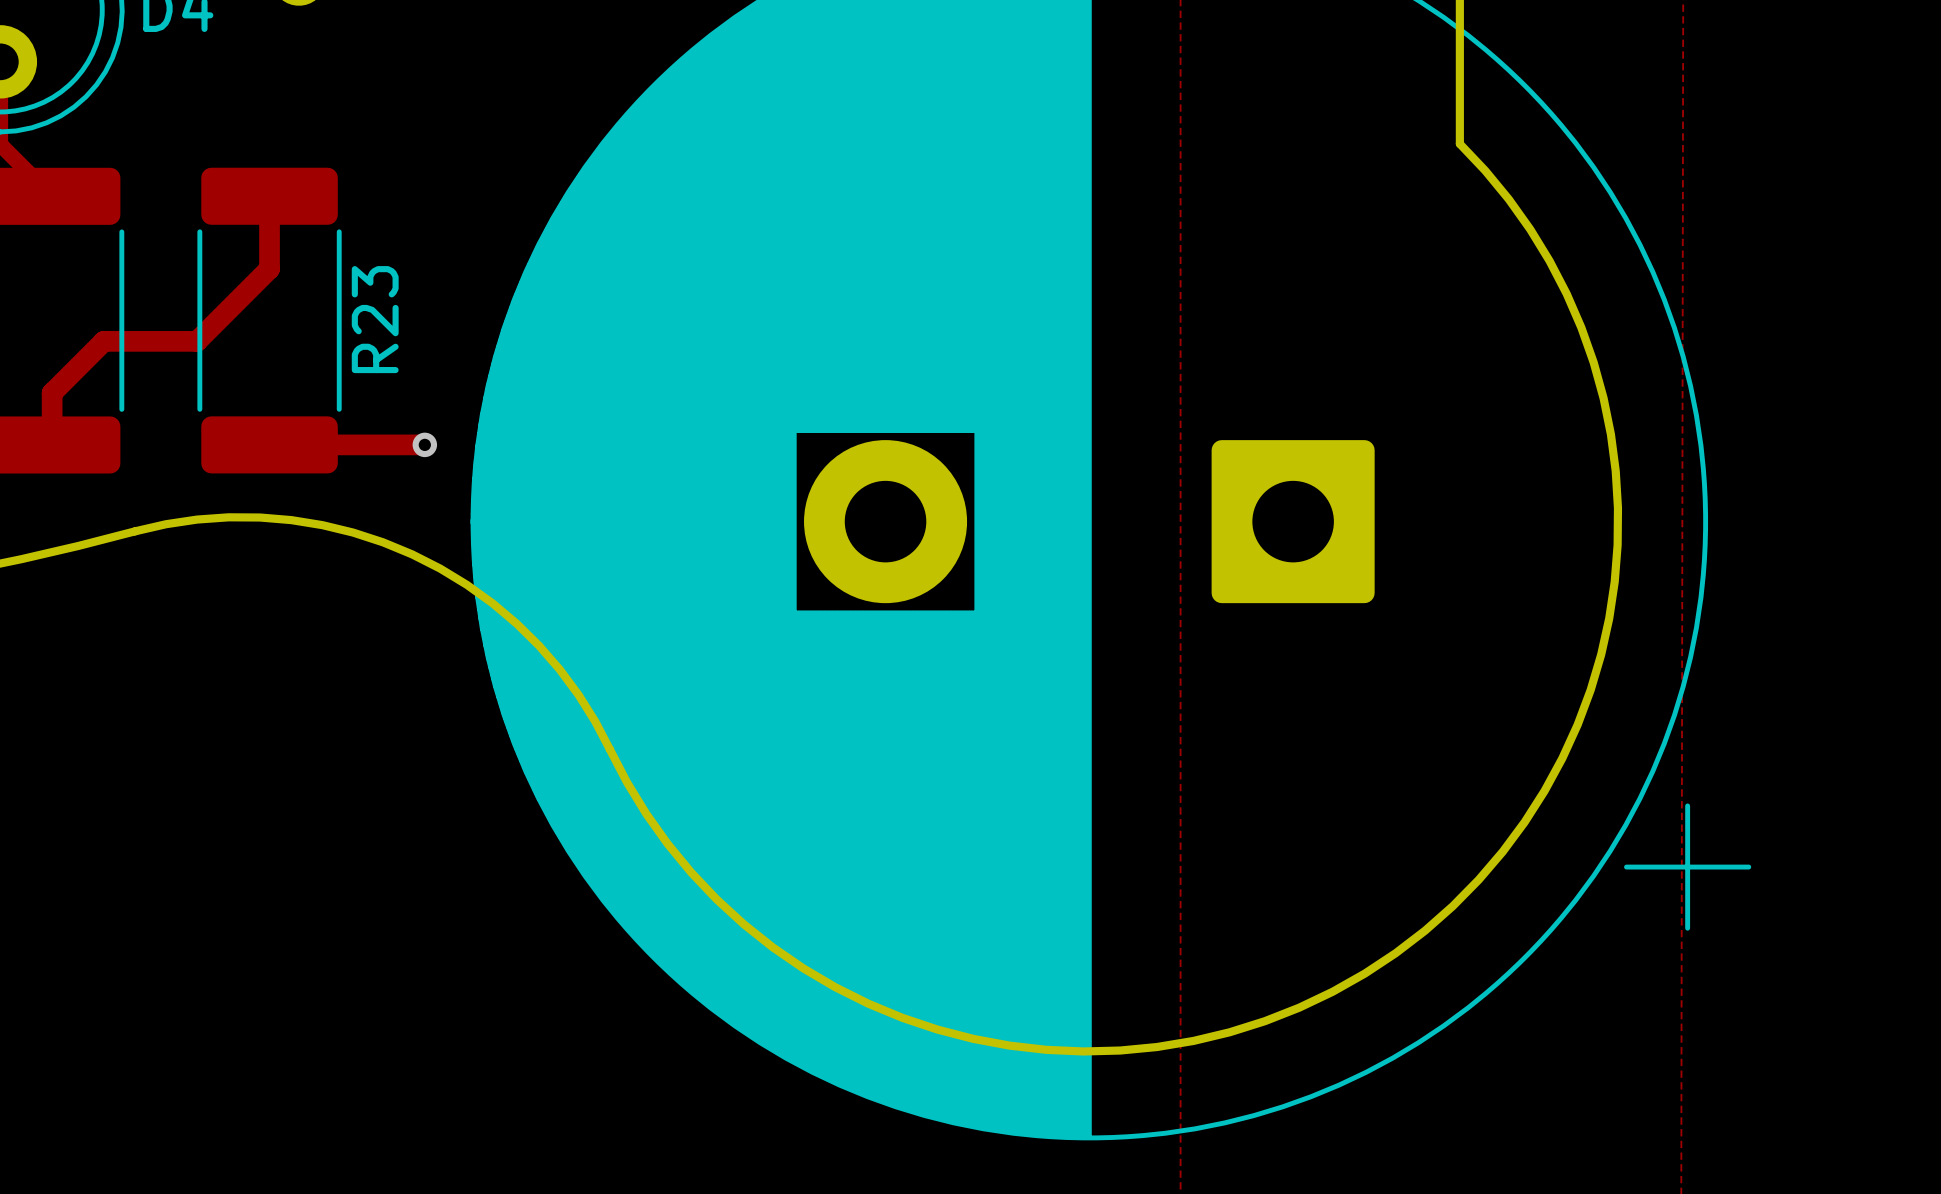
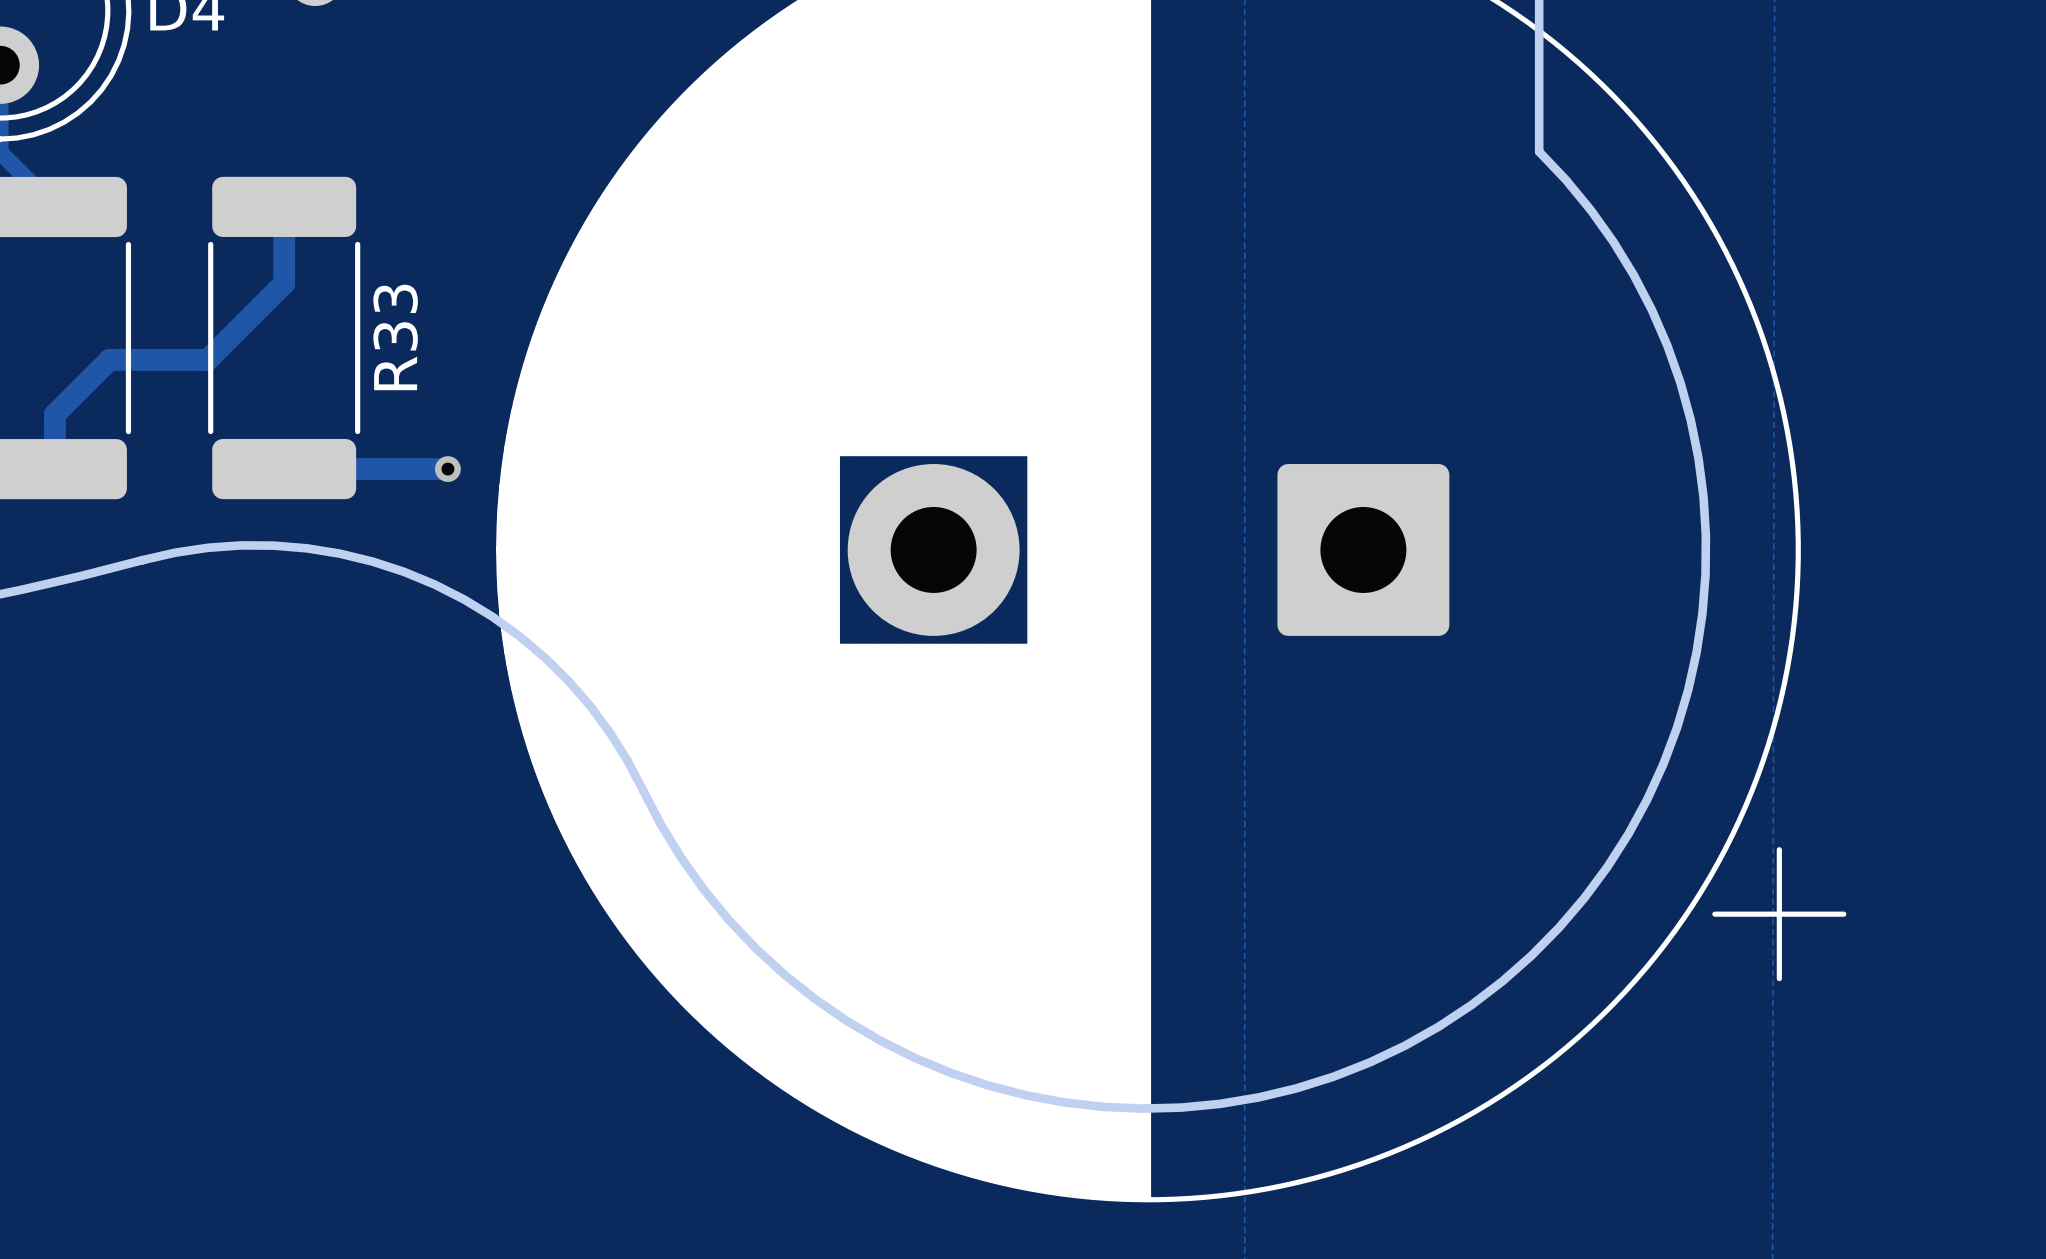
R23 name: R23 (375, 319) -> R33 (395, 337)

